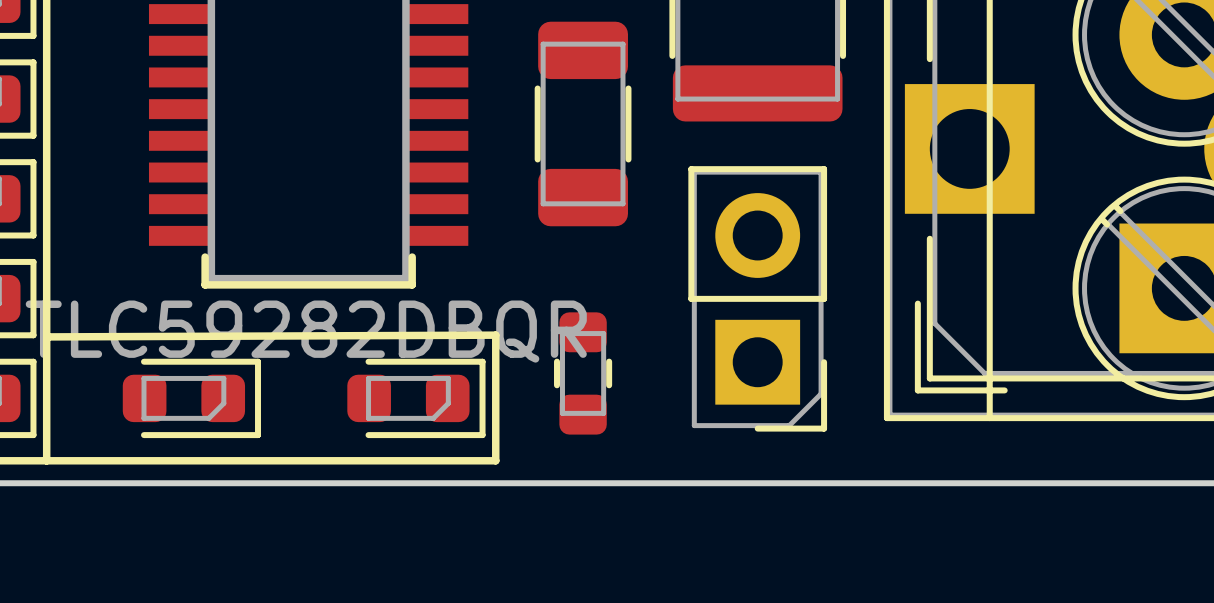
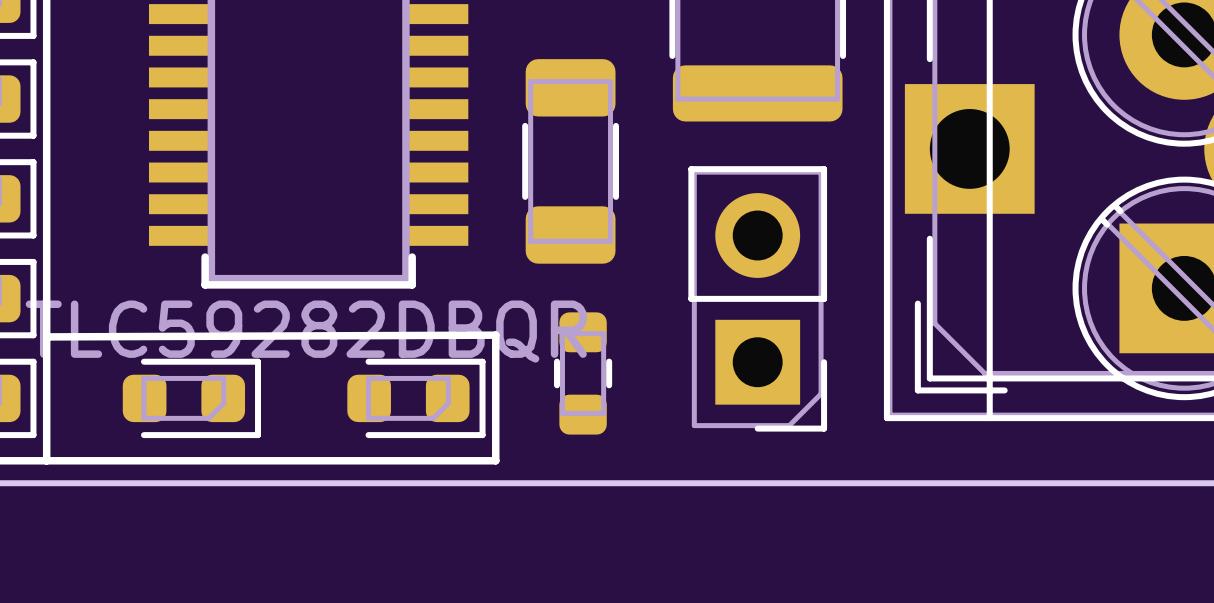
part position: (583, 123) -> (570, 161)

